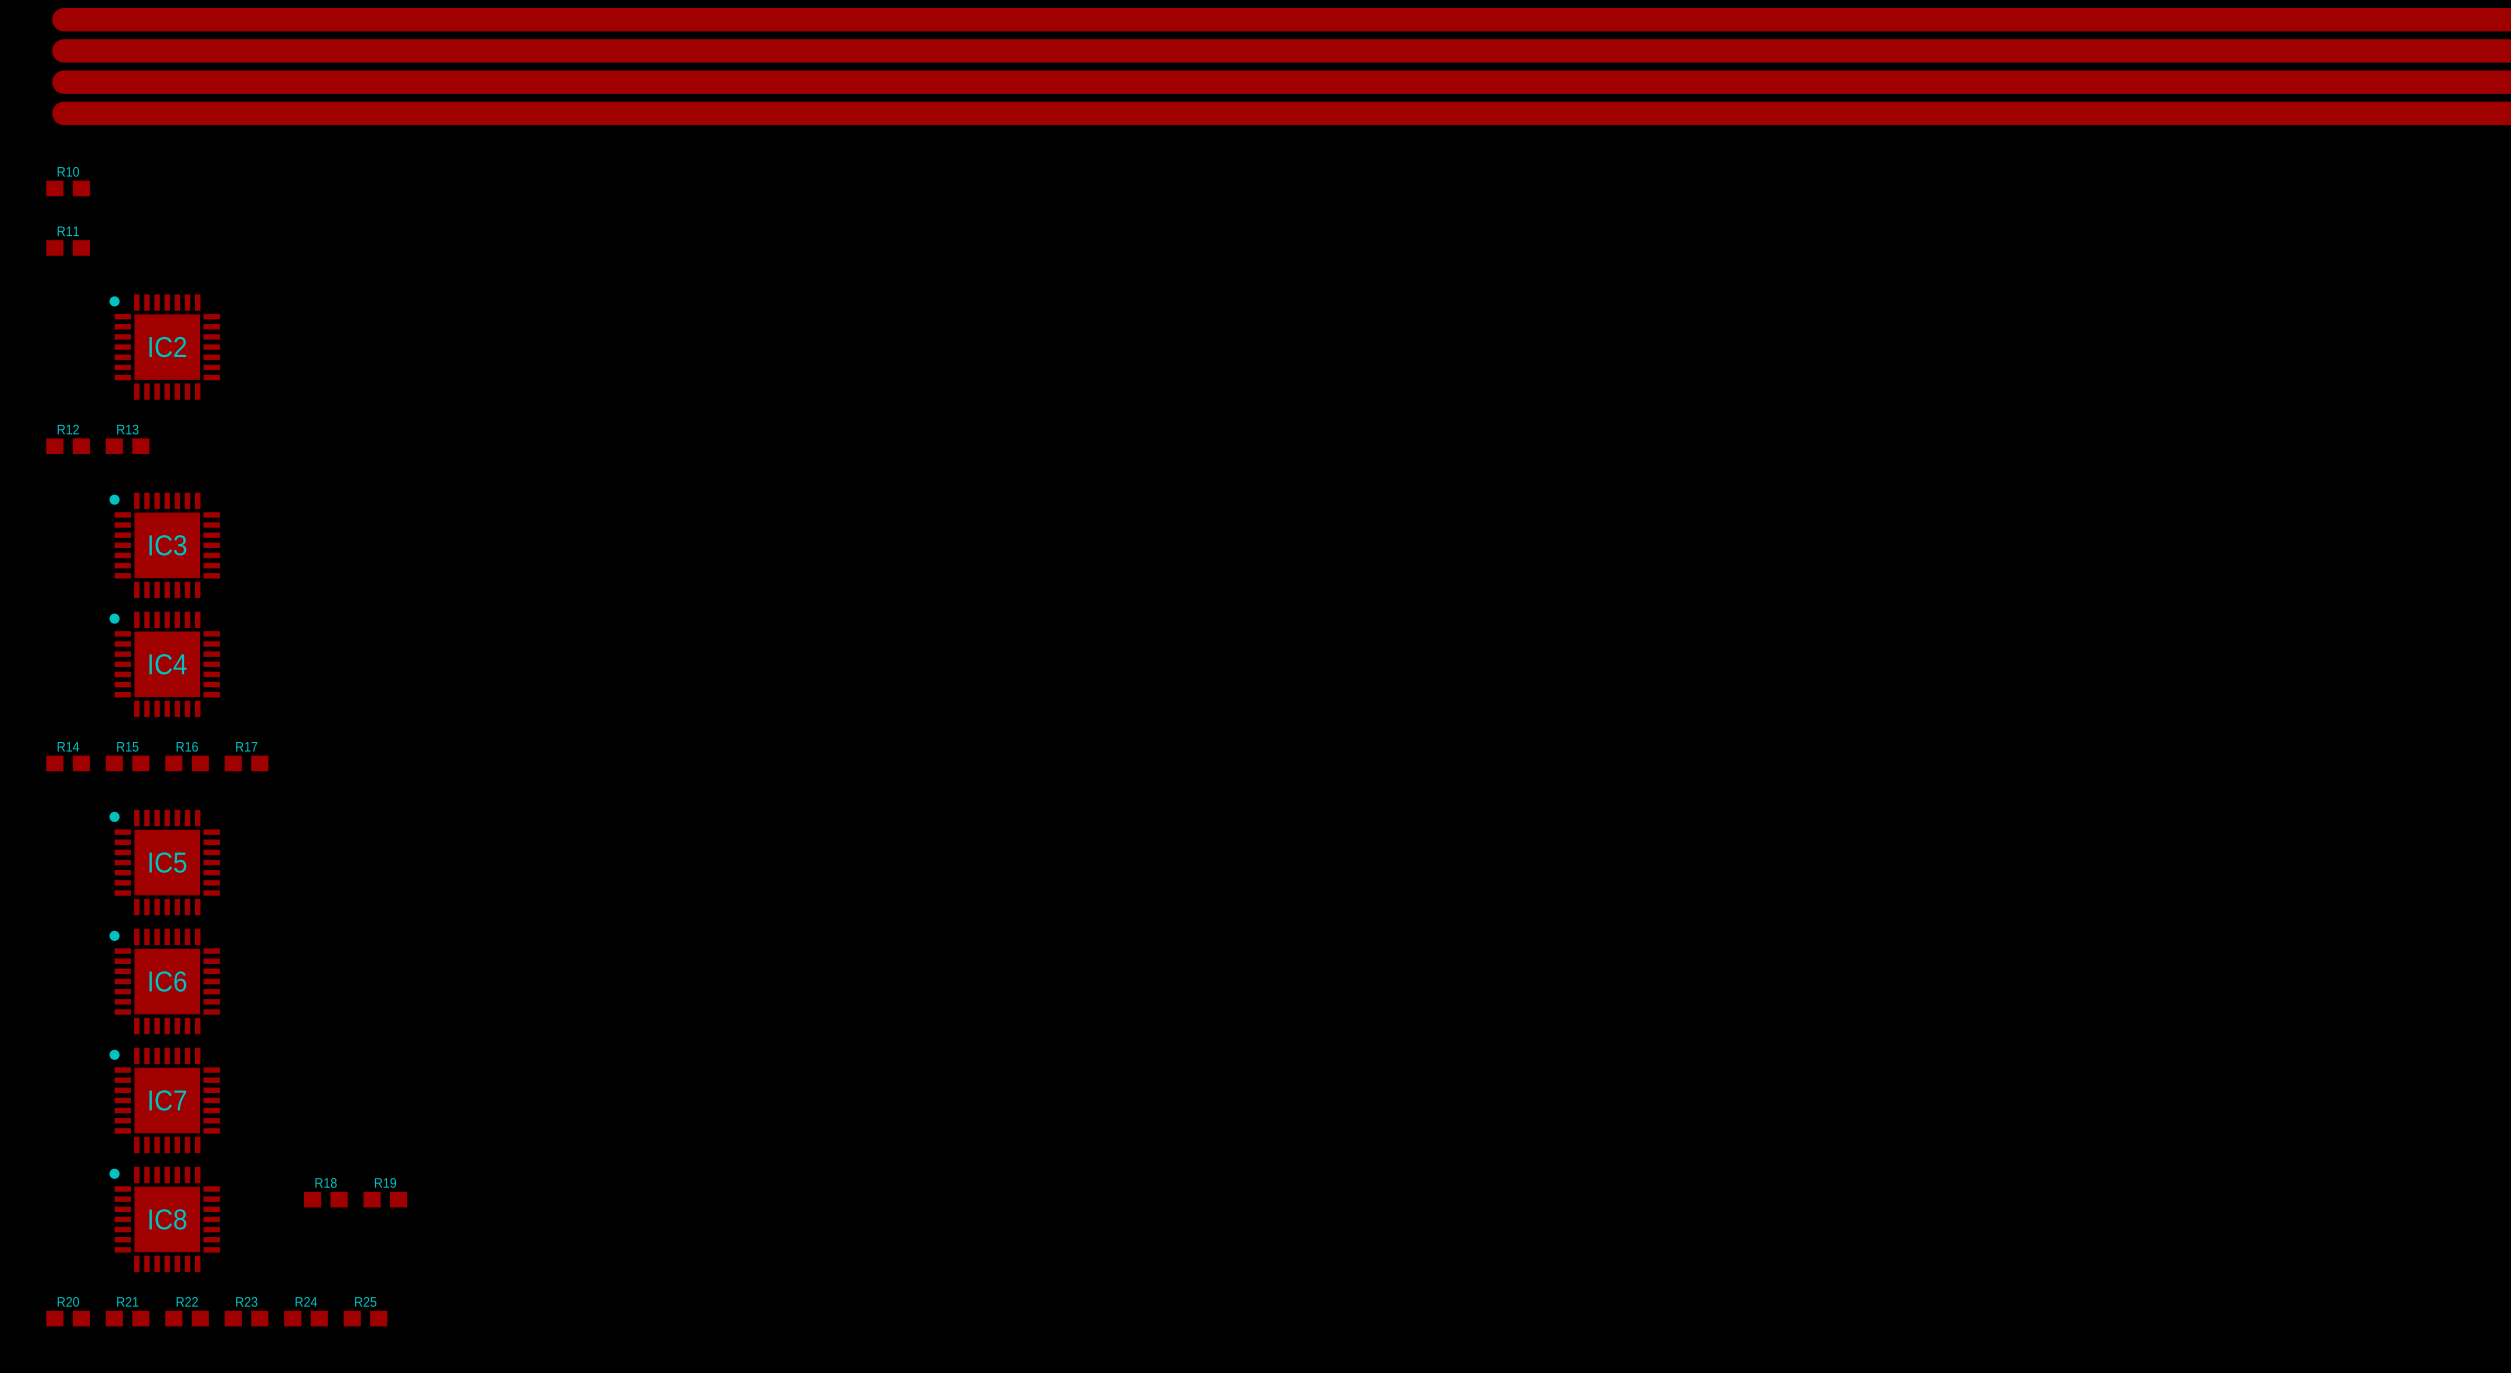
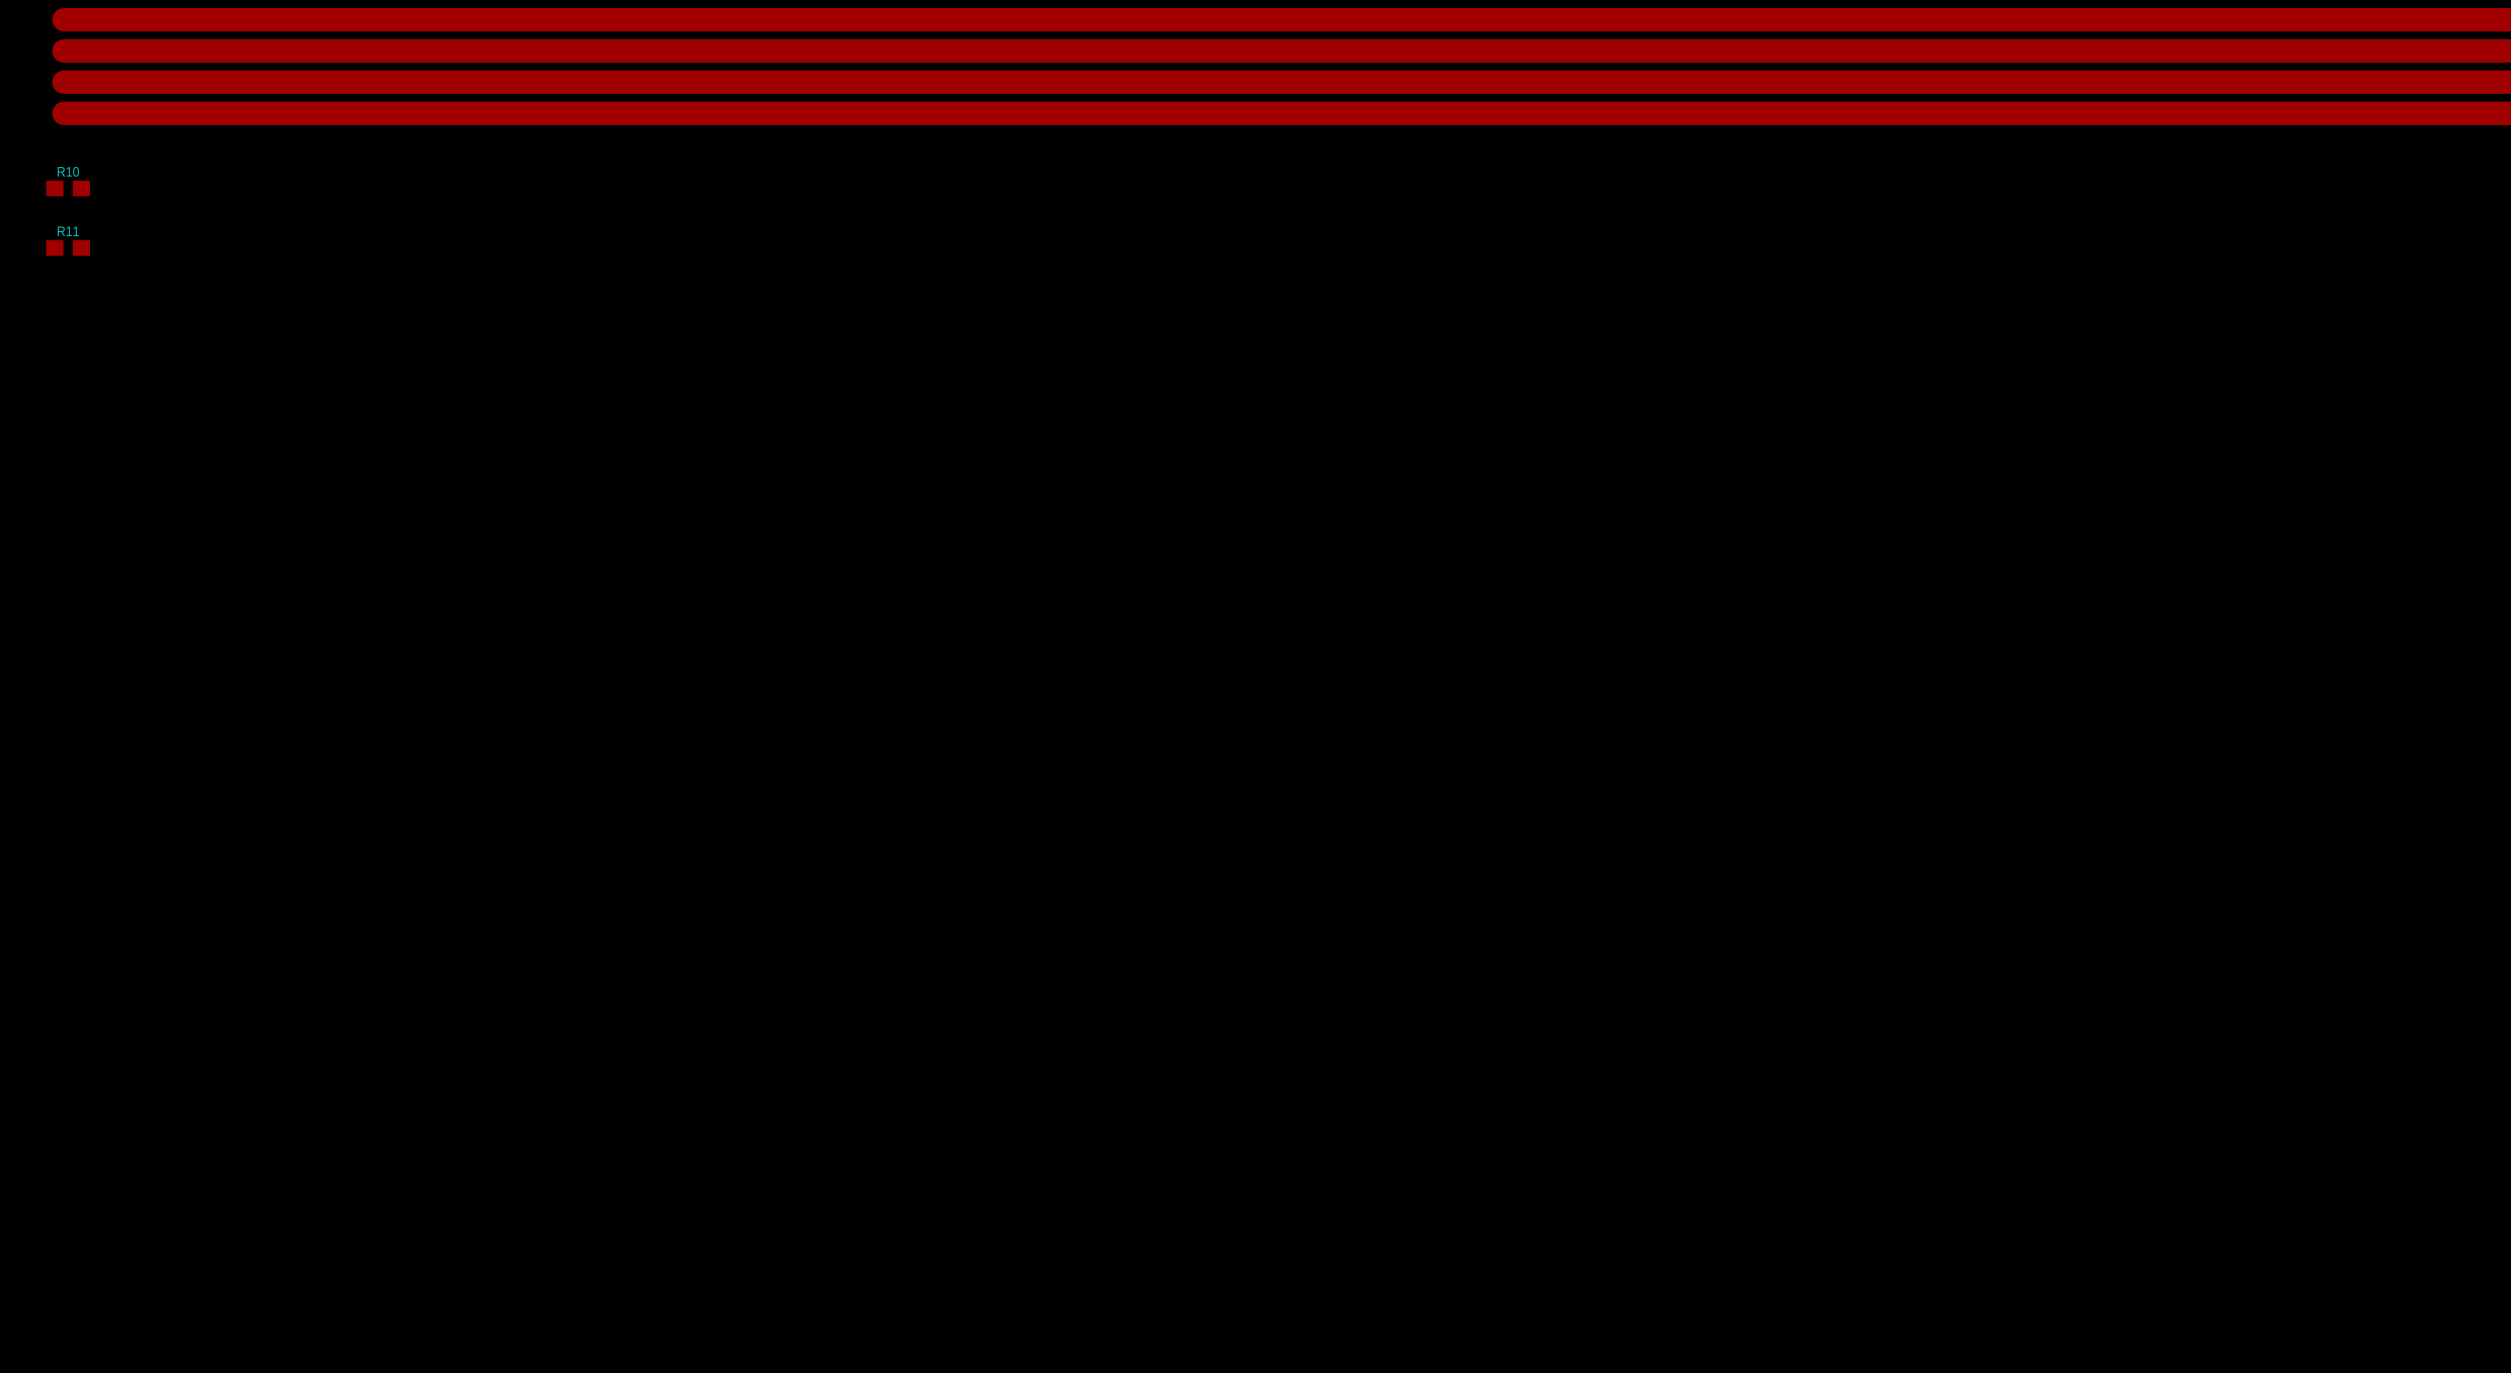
IC2: (164, 347) -> none
R12: (68, 446) -> none
R13: (127, 446) -> none
IC3: (164, 545) -> none
IC4: (164, 664) -> none
R14: (68, 763) -> none
R15: (127, 763) -> none
R16: (187, 763) -> none
R17: (246, 763) -> none
IC5: (164, 862) -> none
IC6: (164, 981) -> none
IC7: (164, 1100) -> none
R18: (325, 1199) -> none
R19: (385, 1199) -> none
IC8: (164, 1219) -> none
R20: (68, 1318) -> none
R21: (127, 1318) -> none
R22: (187, 1318) -> none
R23: (246, 1318) -> none
R24: (306, 1318) -> none
R25: (365, 1318) -> none

